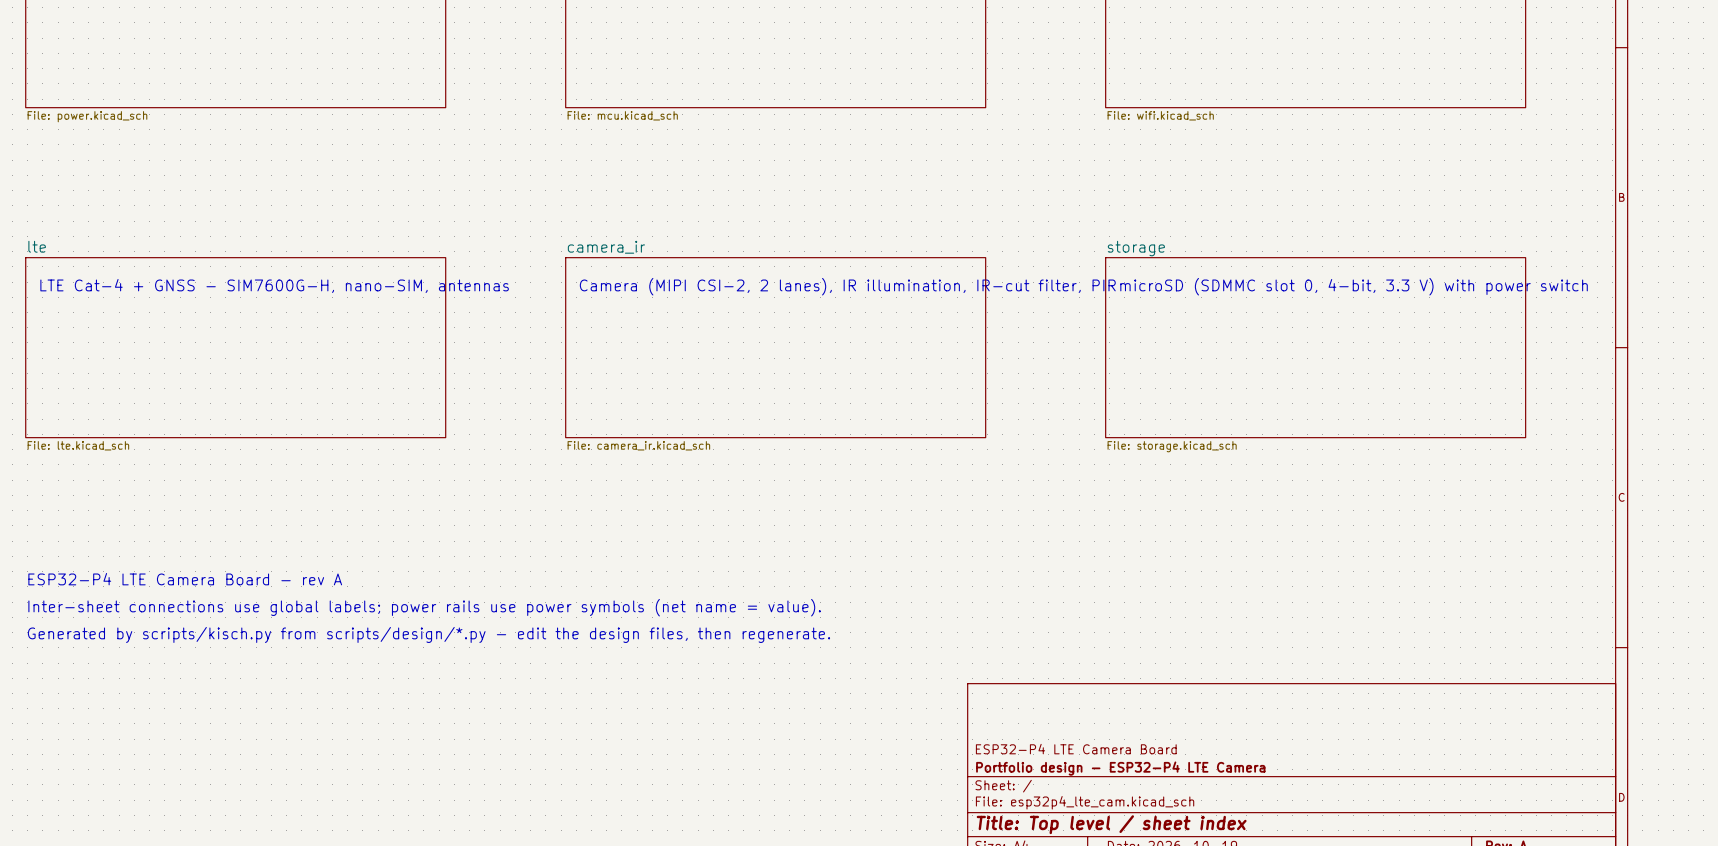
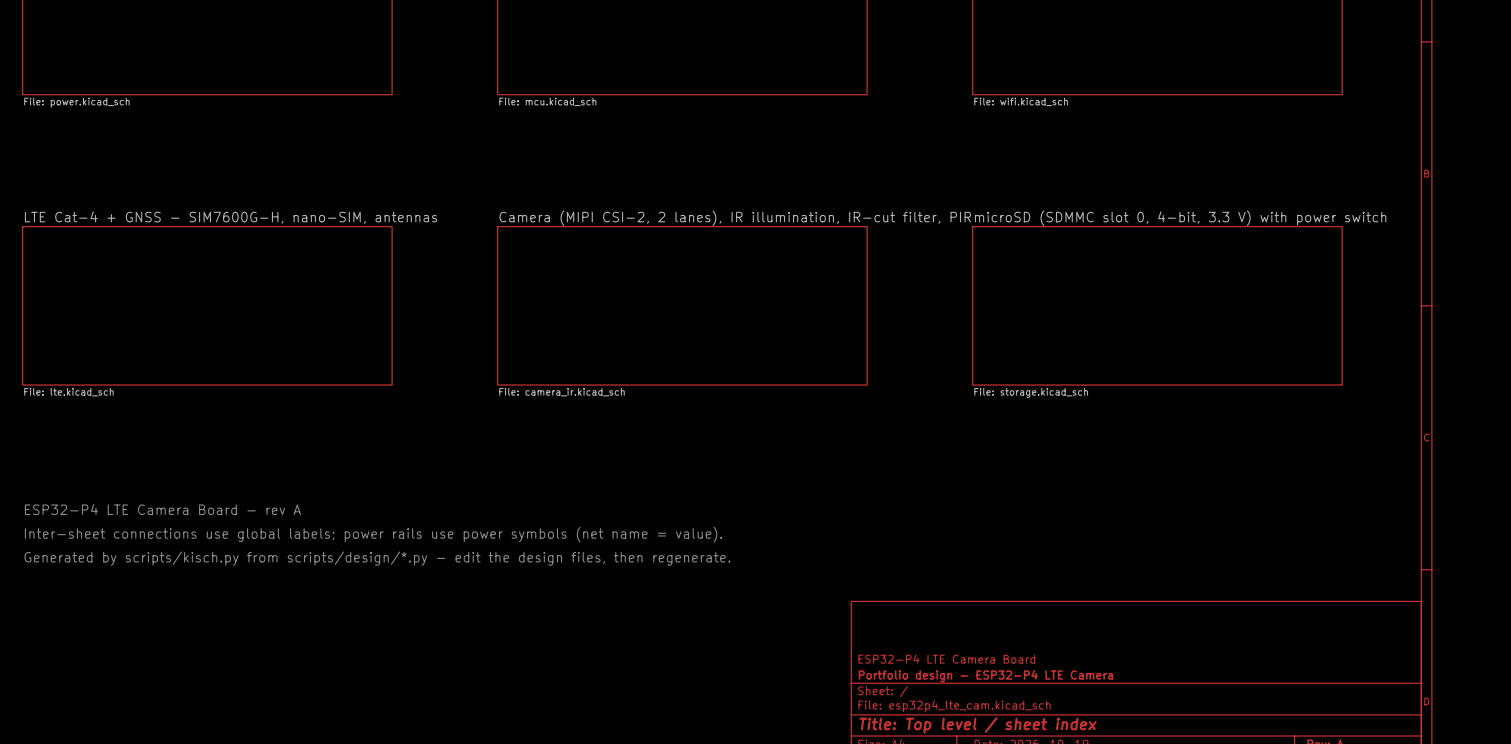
sheet lte name: lte (37, 246) -> LTE Cat-4 + GNSS - SIM7600G-H, nano-SIM, antennas (231, 217)
sheet camera_ir name: camera_ir (606, 247) -> Camera (MIPI CSI-2, 2 lanes), IR illumination, IR-cut filter, PIR (735, 218)
sheet storage name: storage (1136, 248) -> microSD (SDMMC slot 0, 4-bit, 3.3 V) with power switch (1180, 218)
text: LTE Cat-4 + GNSS - SIM7600G-H, nano-SIM, antennas (274, 285) -> none
text: Camera (MIPI CSI-2, 2 lanes), IR illumination, IR-cut filter, PIR (847, 286) -> none
text: microSD (SDMMC slot 0, 4-bit, 3.3 V) with power switch (1354, 286) -> none

